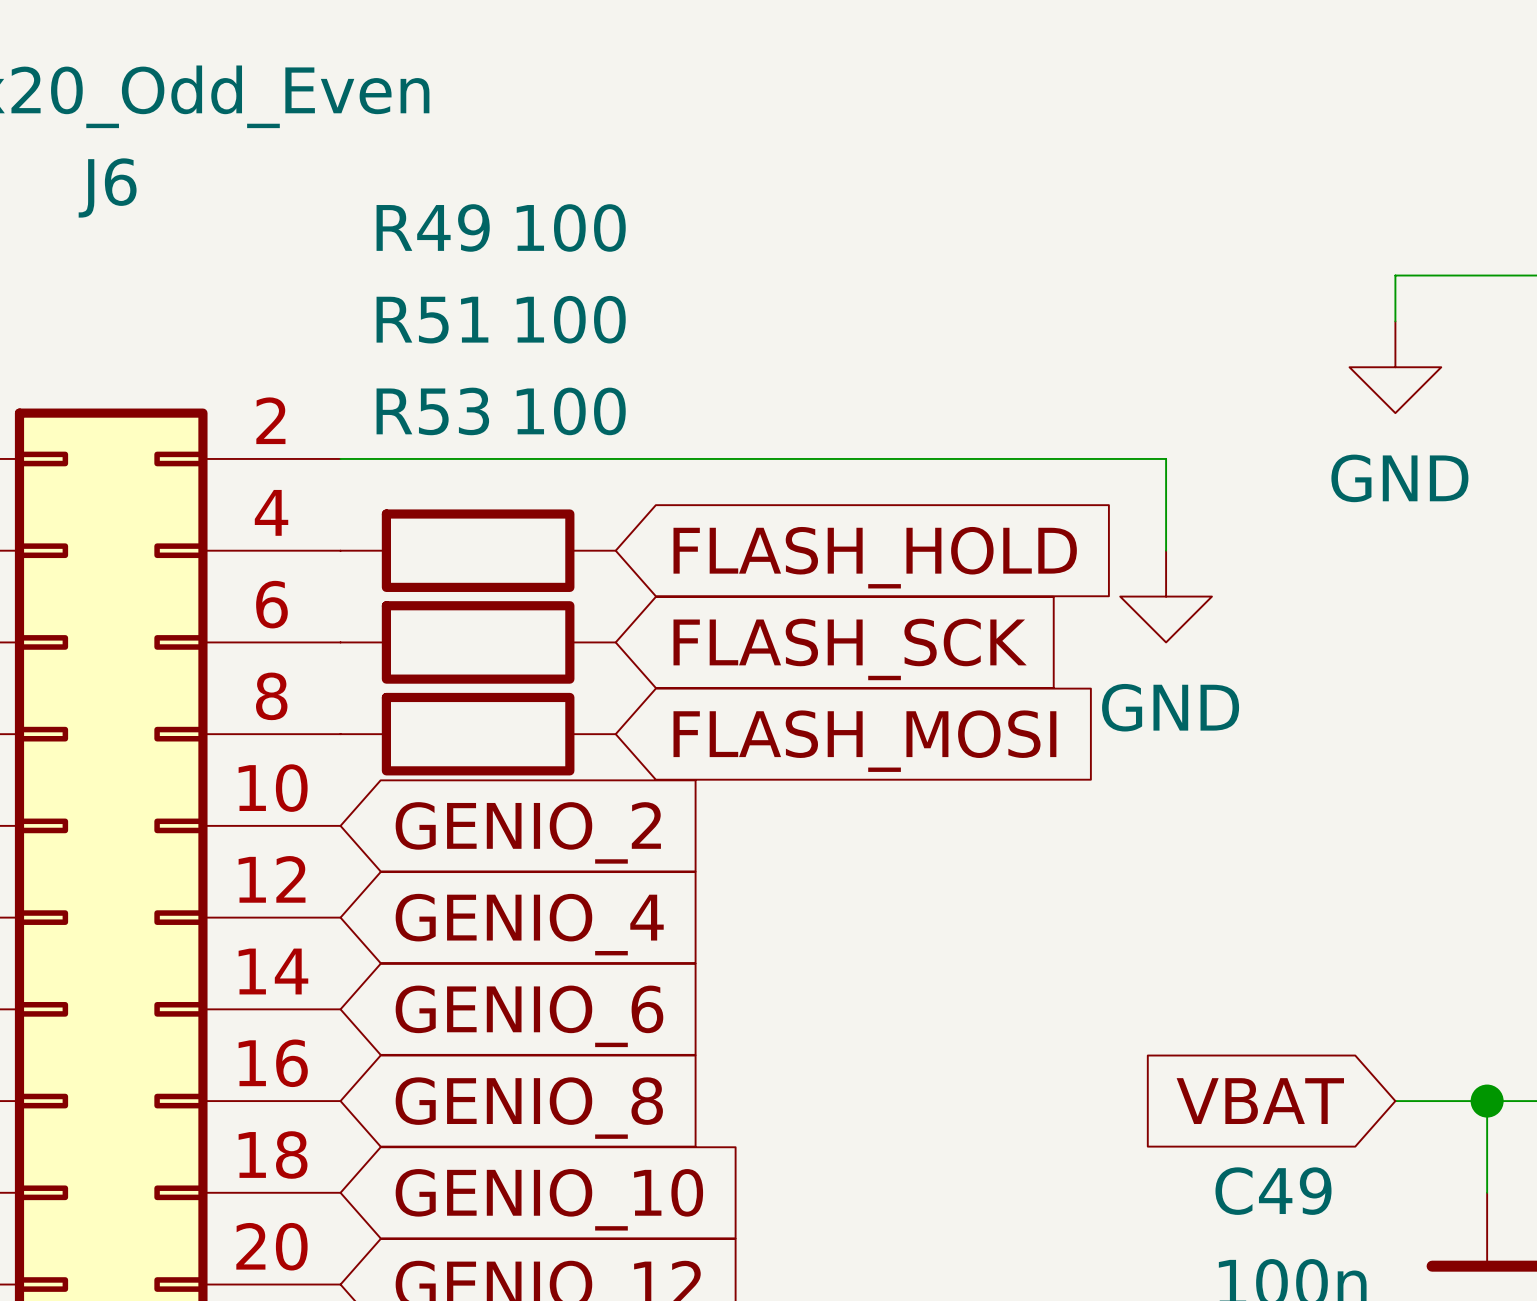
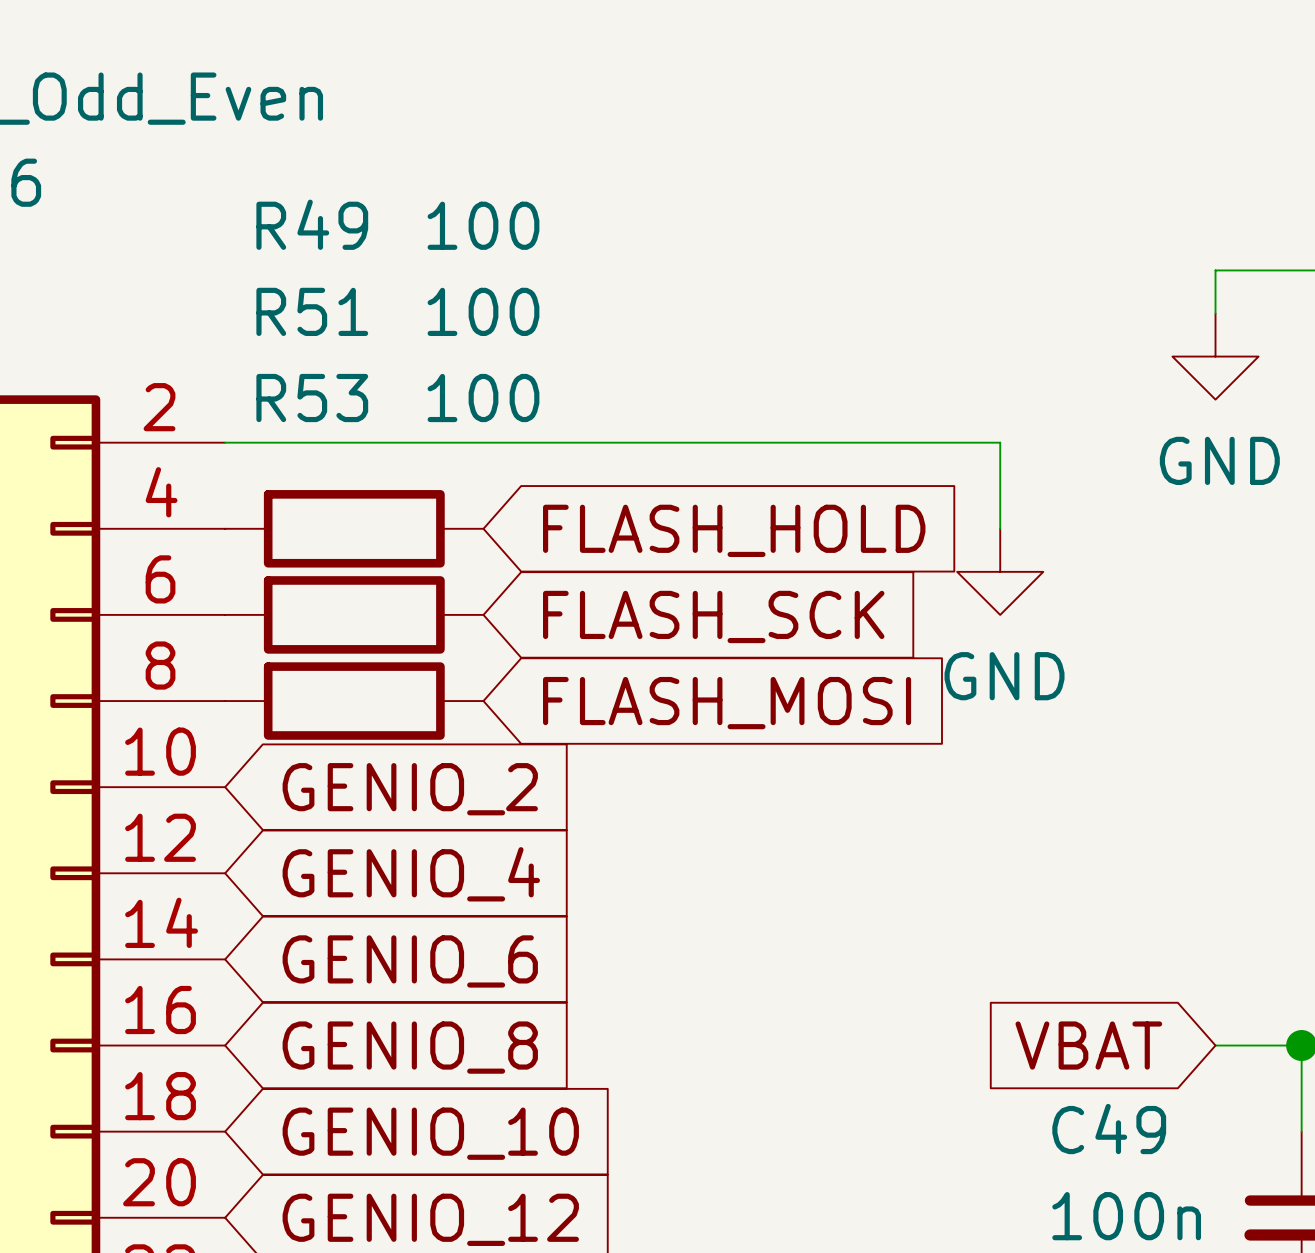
R49 value position: 100 (571, 227) -> 100 (483, 225)
R51 value position: 100 (571, 319) -> 100 (483, 311)
R53 value position: 100 (571, 411) -> 100 (483, 398)

